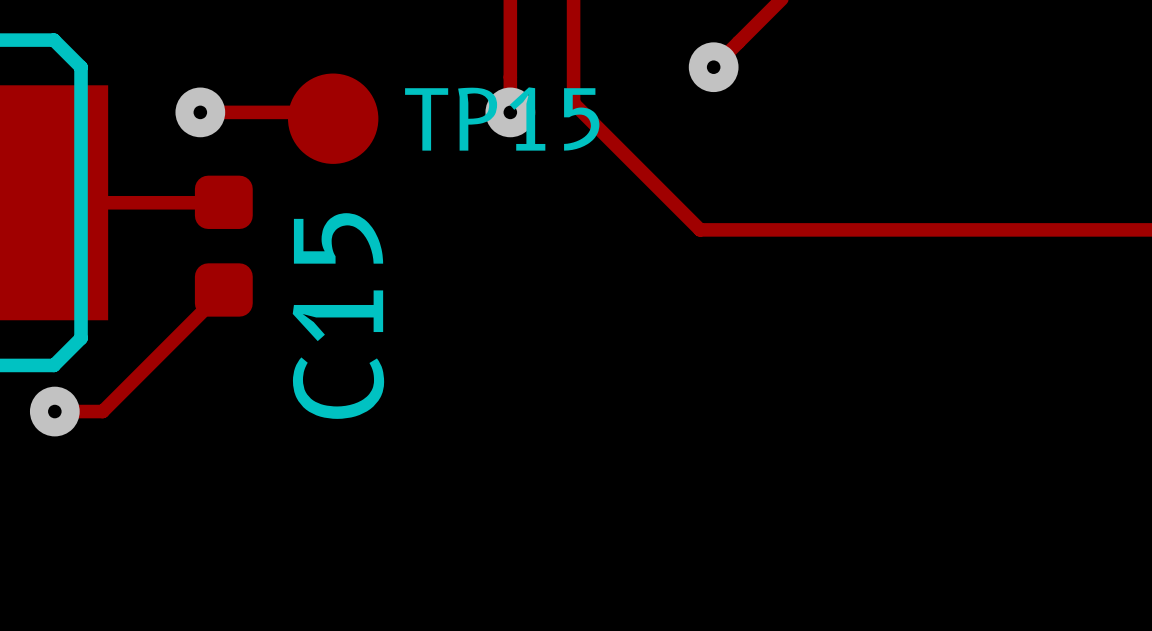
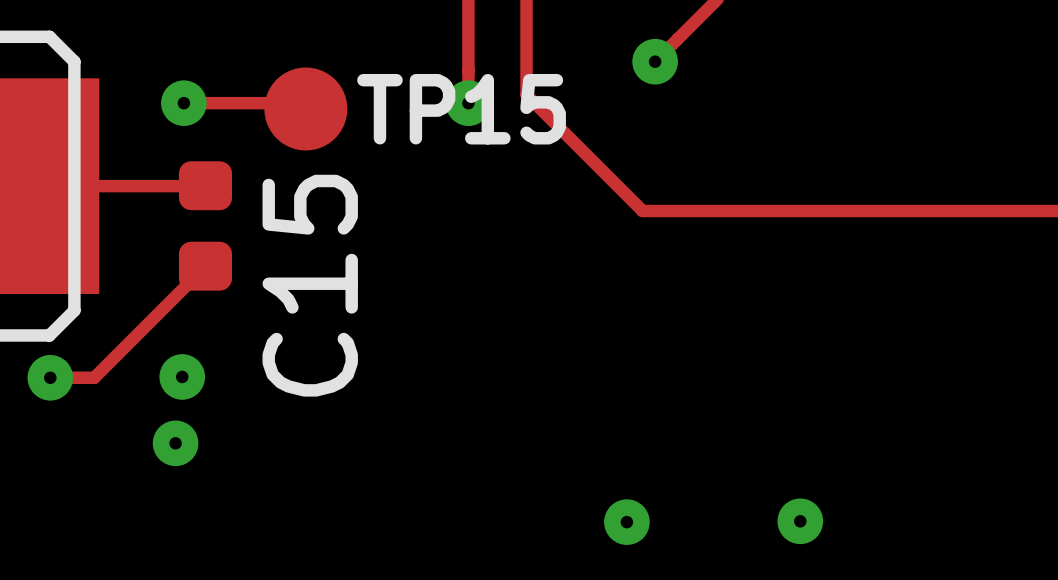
via: none -> (182, 376)
via: none -> (175, 443)
via: none -> (800, 521)
via: none -> (626, 522)

